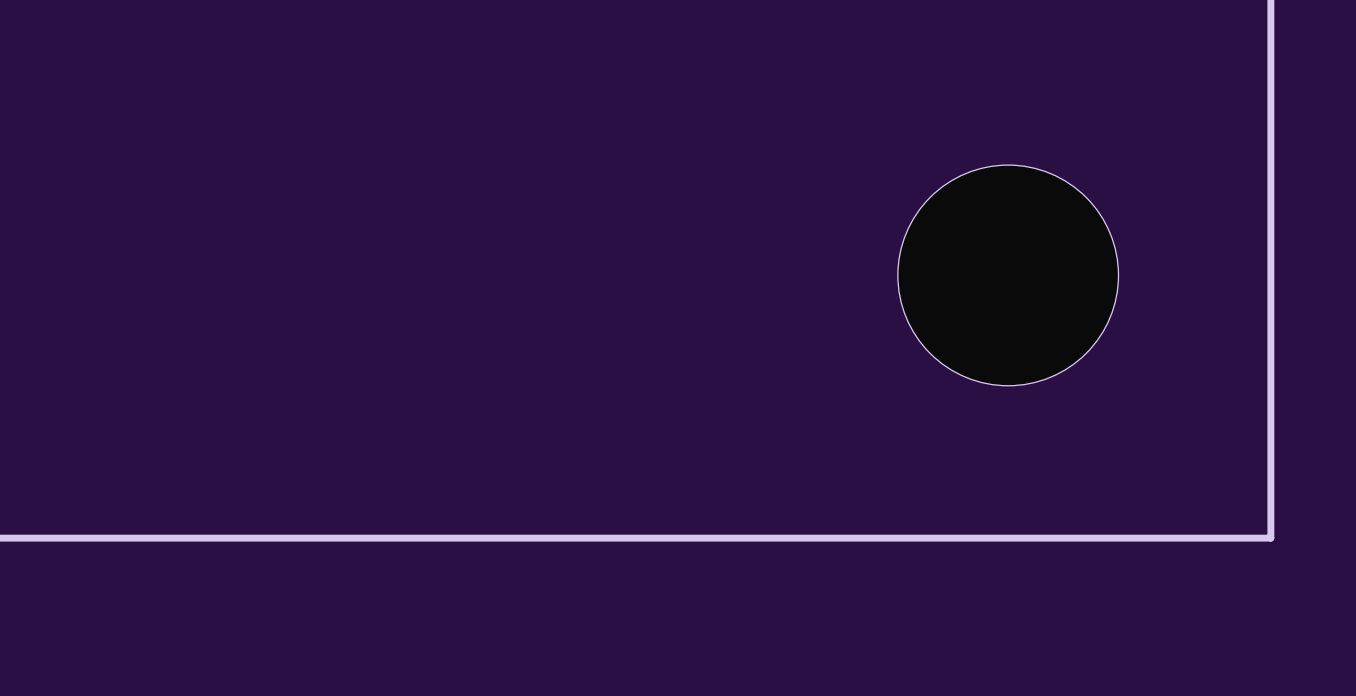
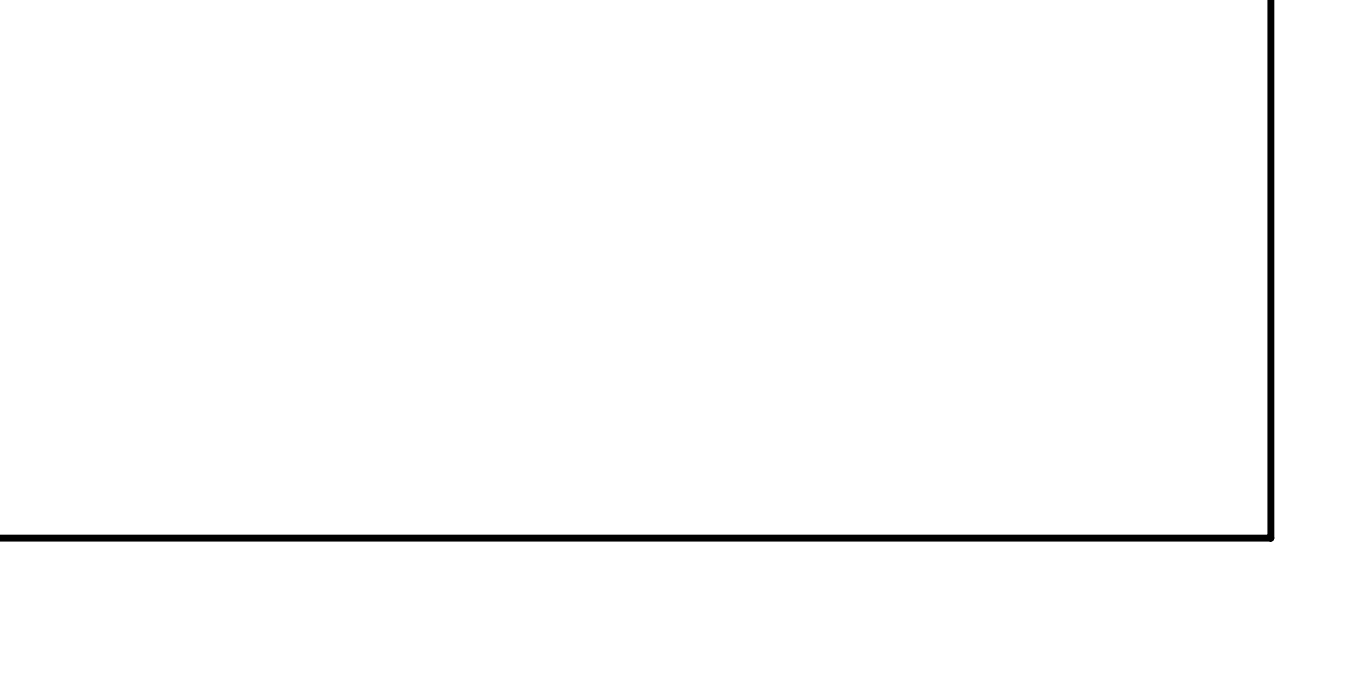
part: (1008, 275) -> none

